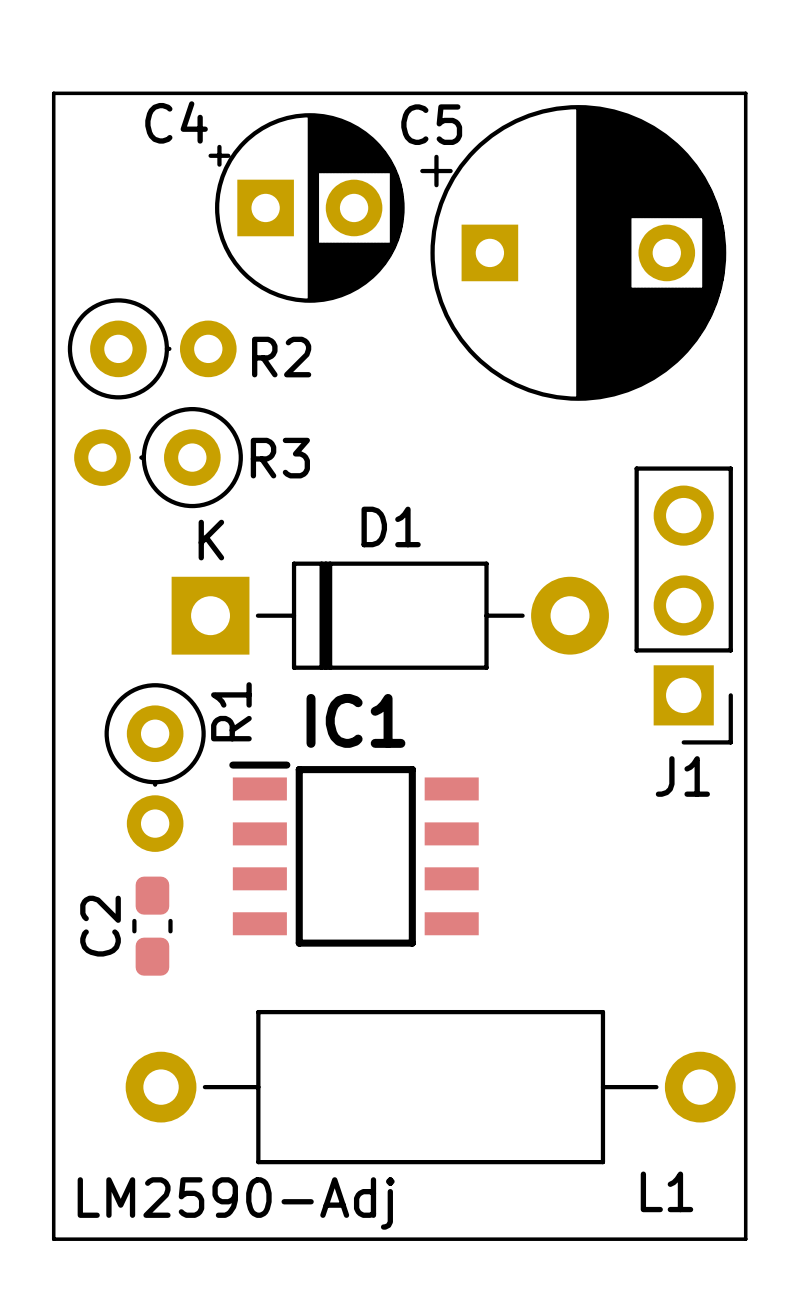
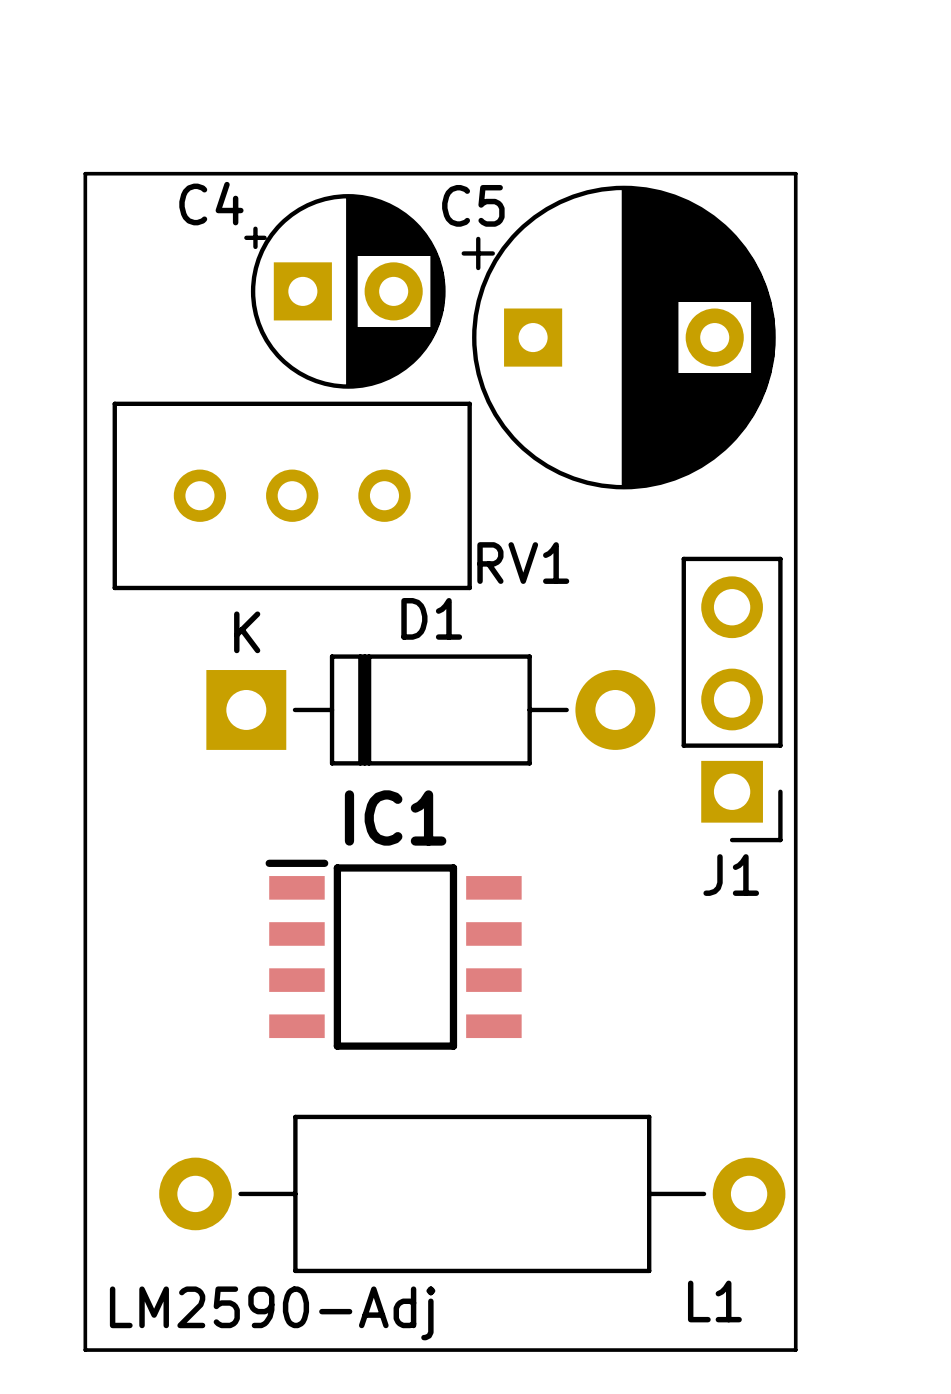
R2: (152, 348) -> none
RV1: none -> (292, 495)
R3: (158, 457) -> none
R1: (155, 767) -> none
C2: (152, 926) -> none

